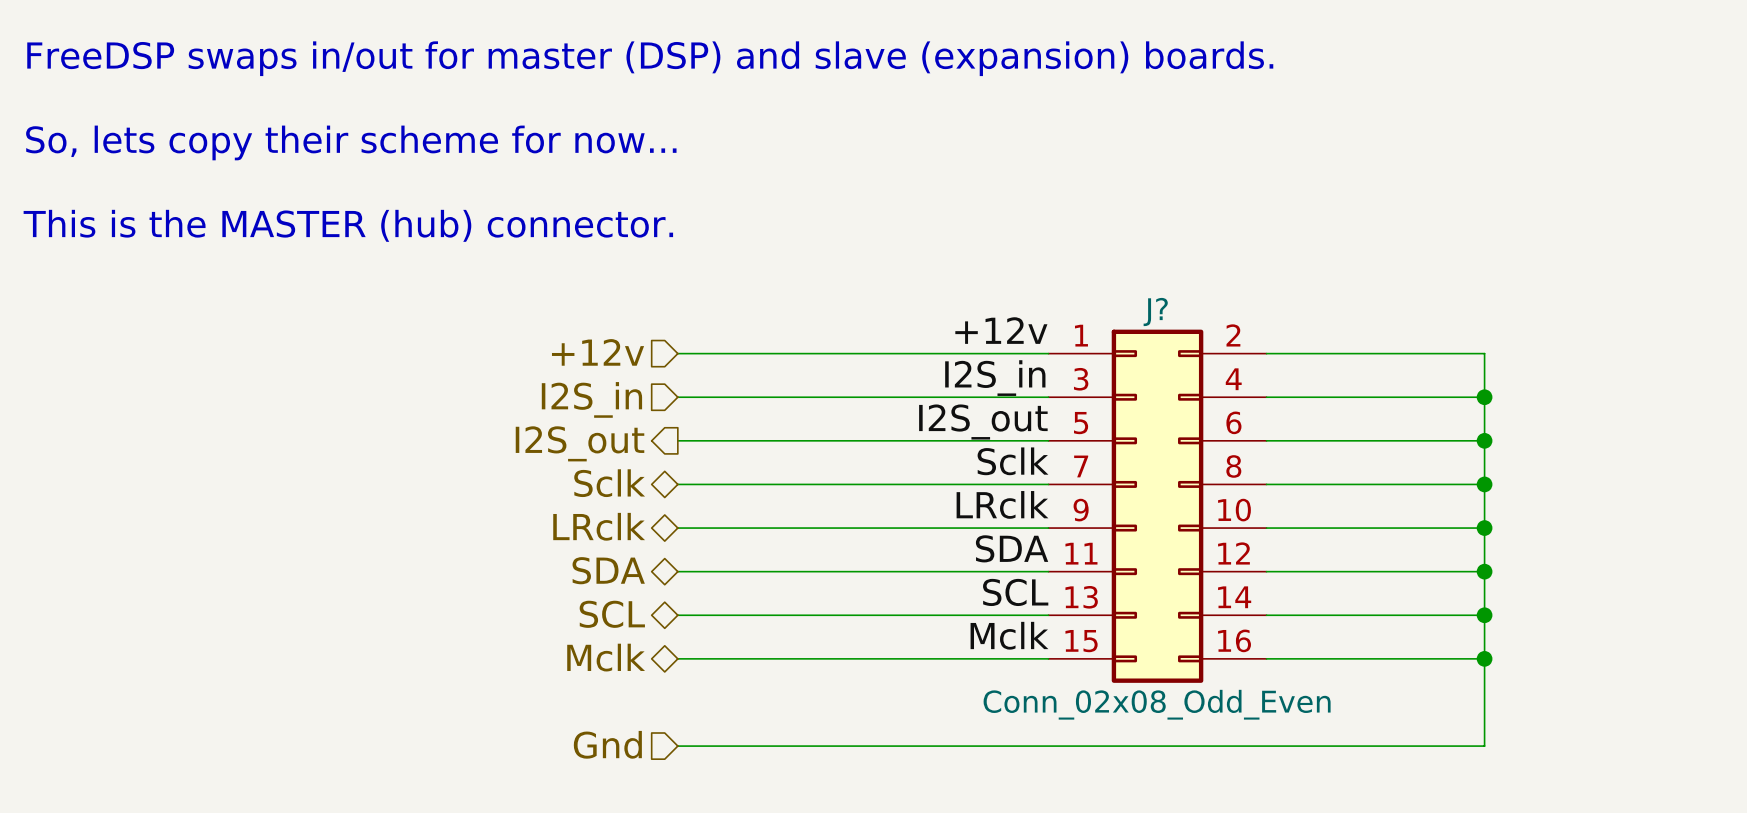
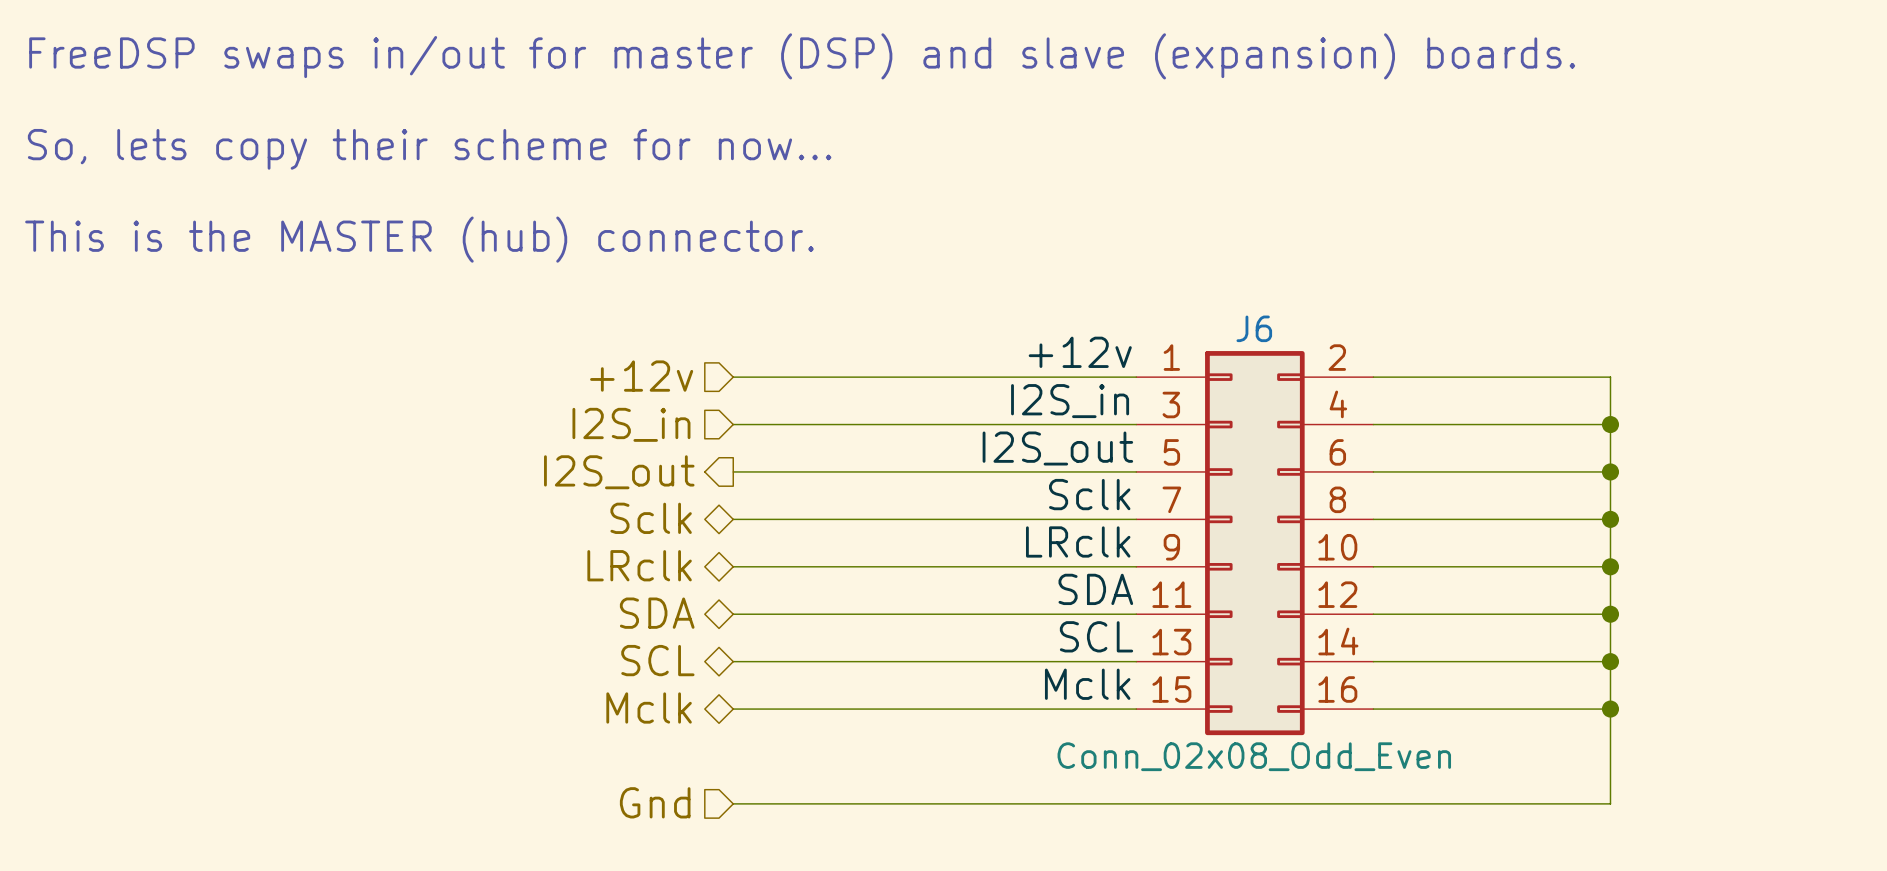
J? name: J? (1155, 311) -> J6 (1254, 328)

